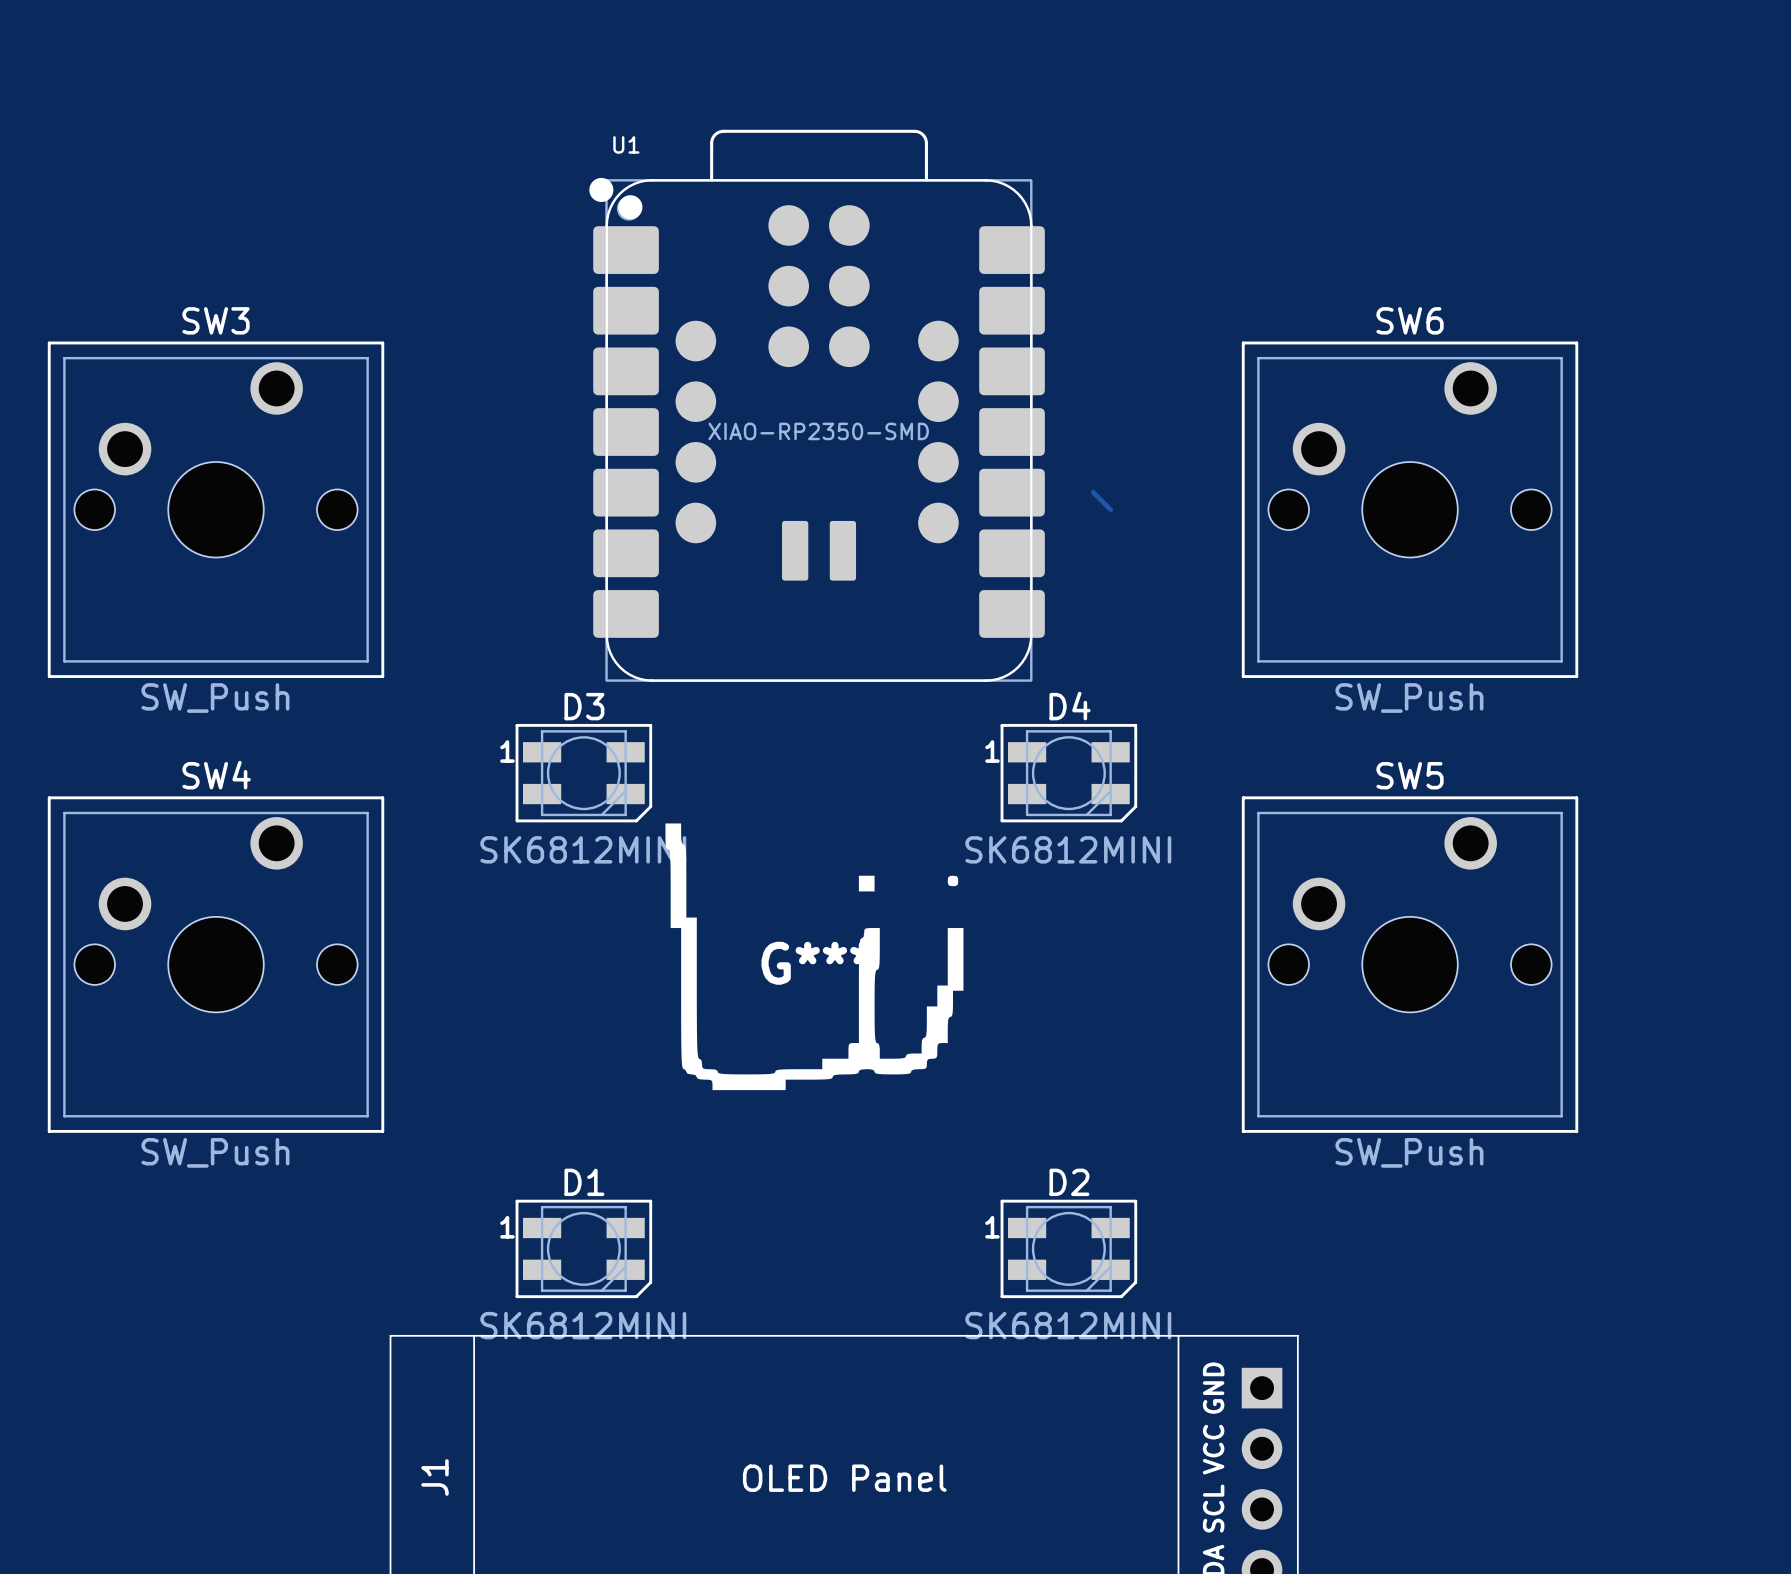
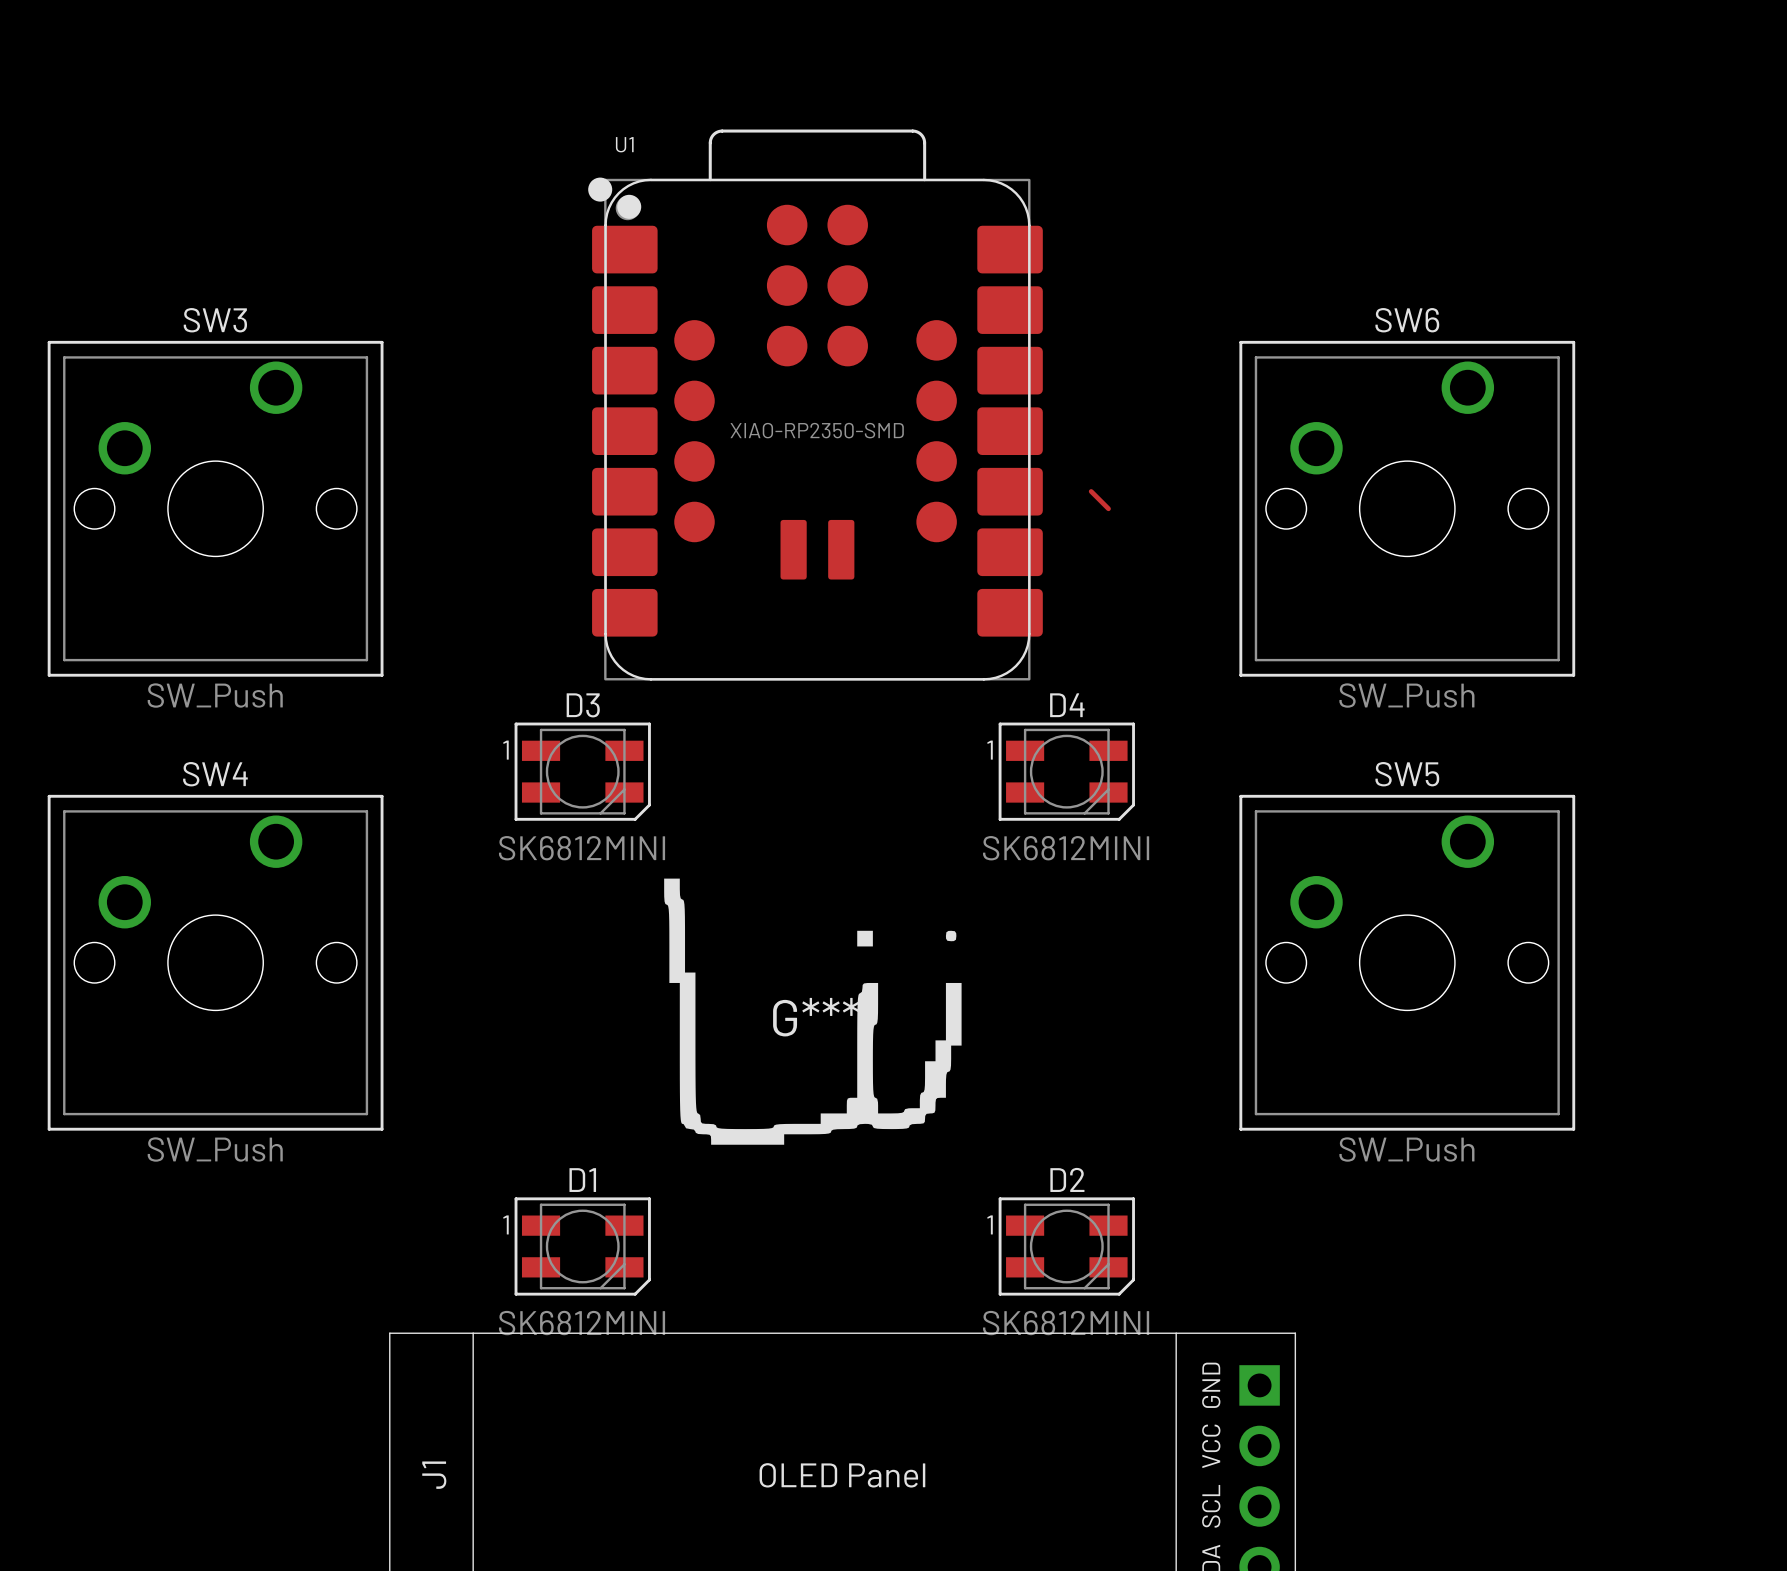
G*** position: (814, 956) -> (812, 1011)

